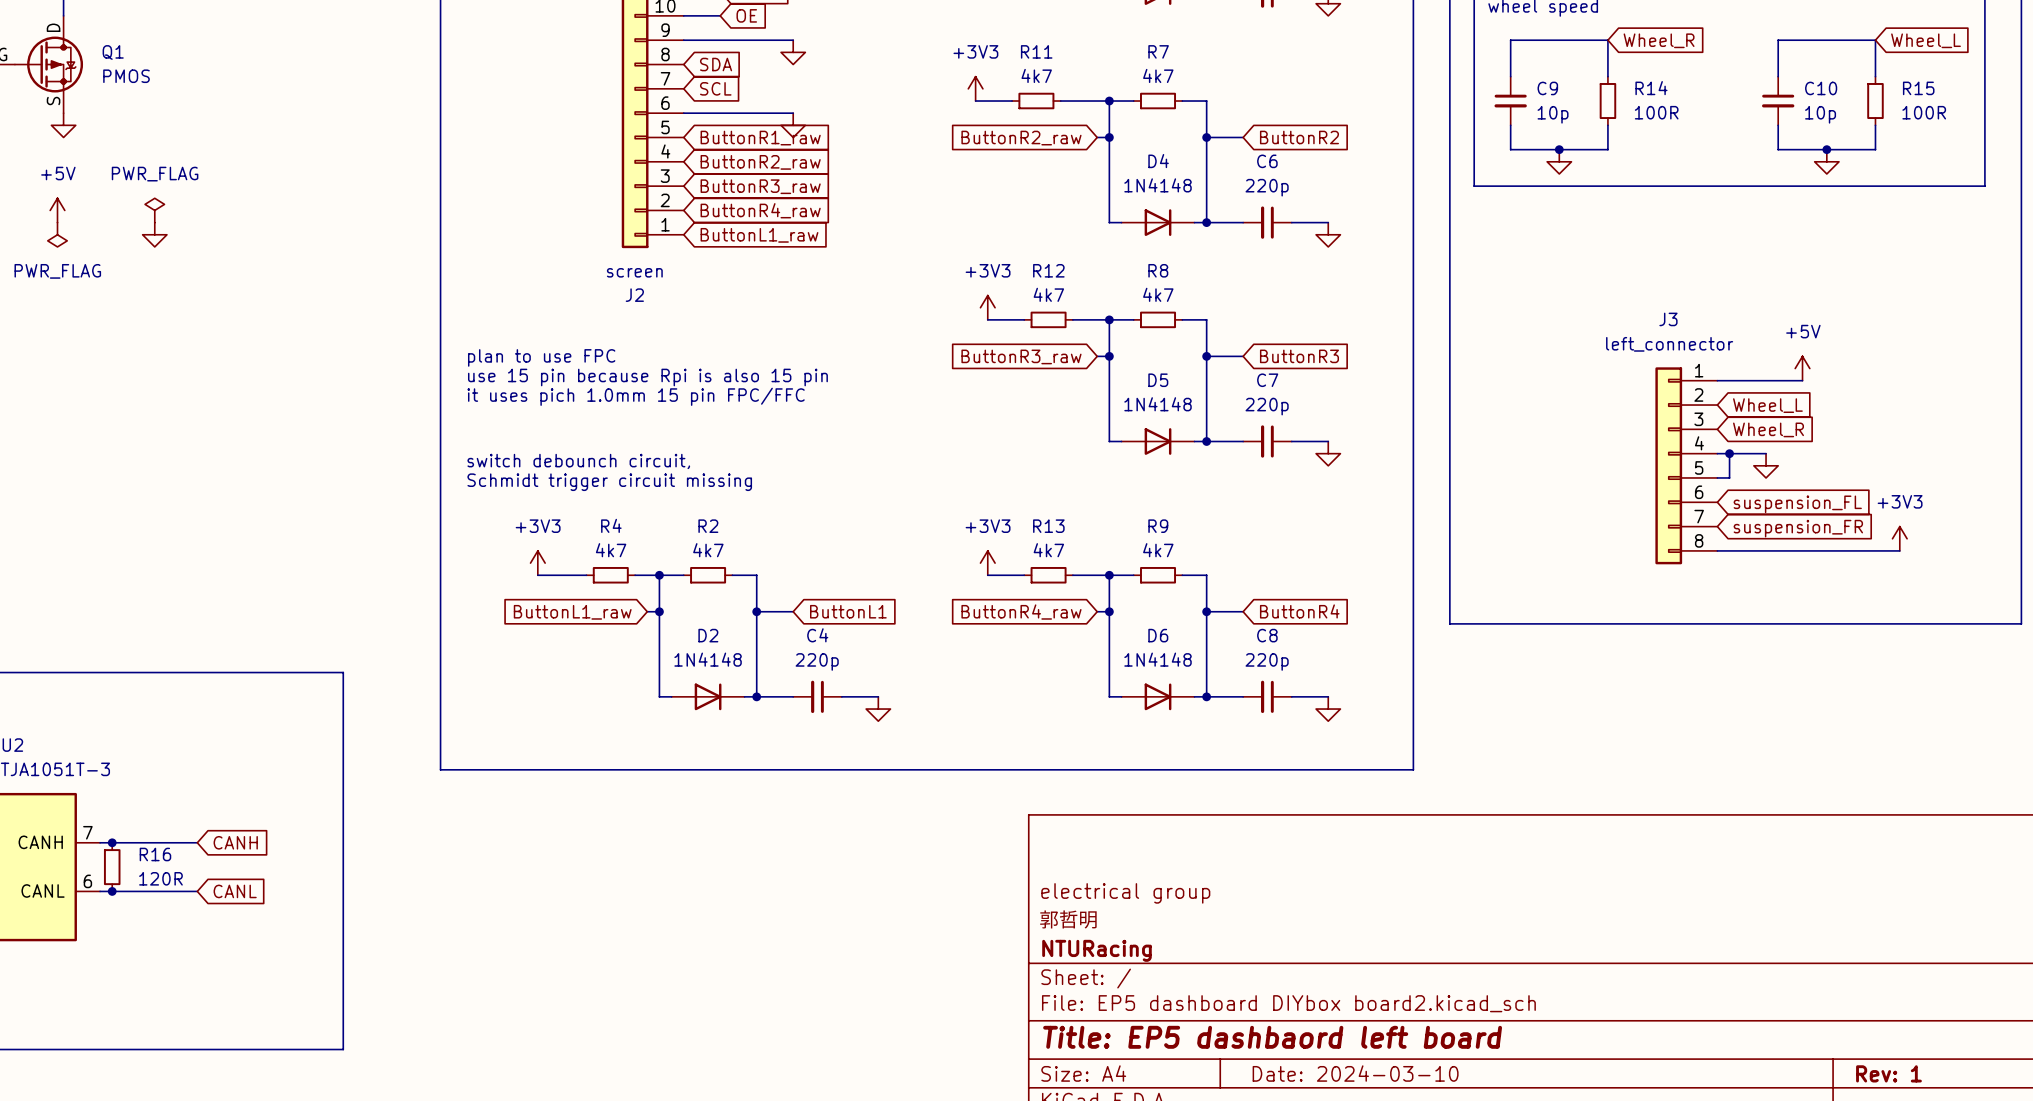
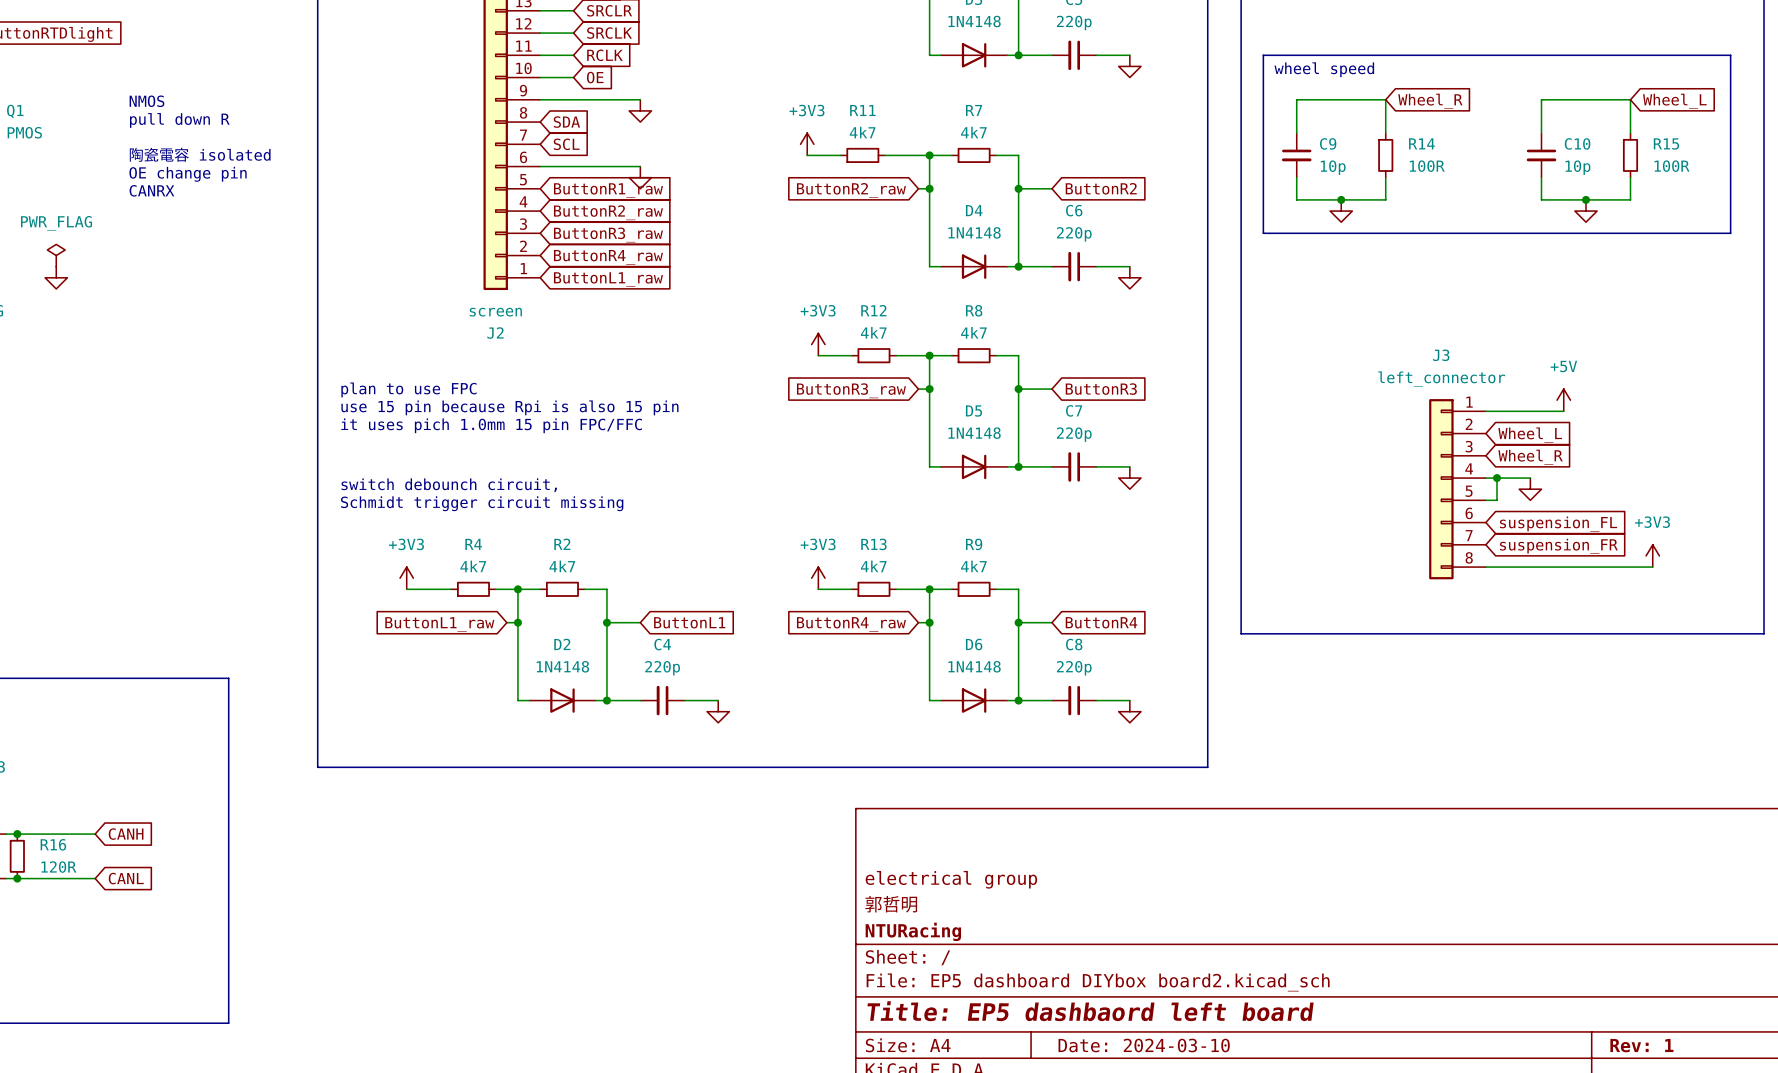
text: none -> NMOS (146, 101)
text: none -> pull down R (179, 120)
text: none -> 陶瓷電容 isolated (200, 154)
text: none -> OE change pin (188, 174)
text: none -> CANRX (151, 190)

